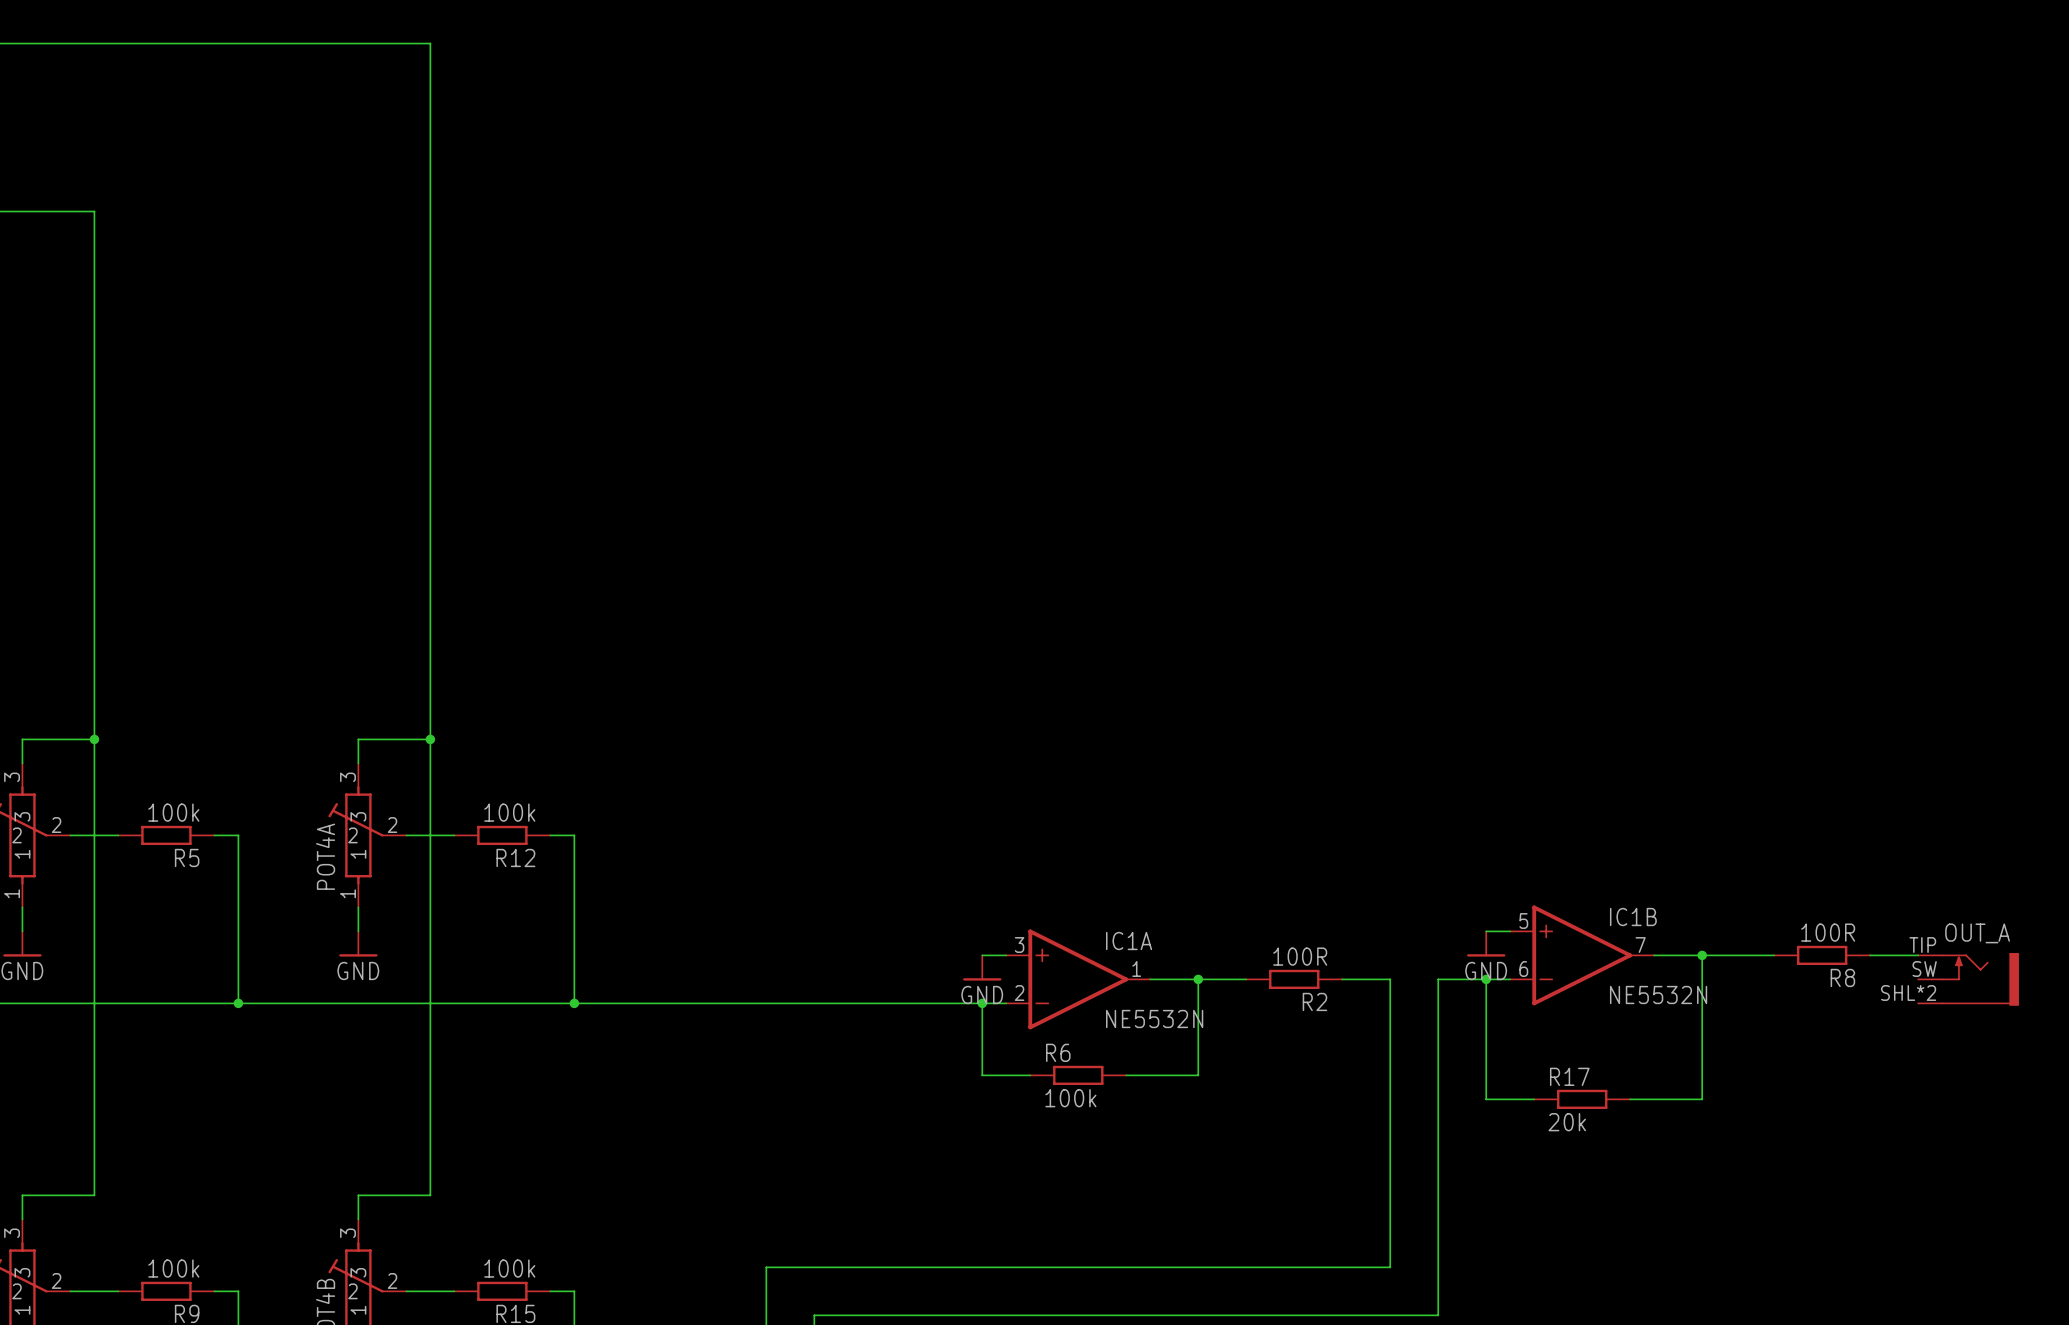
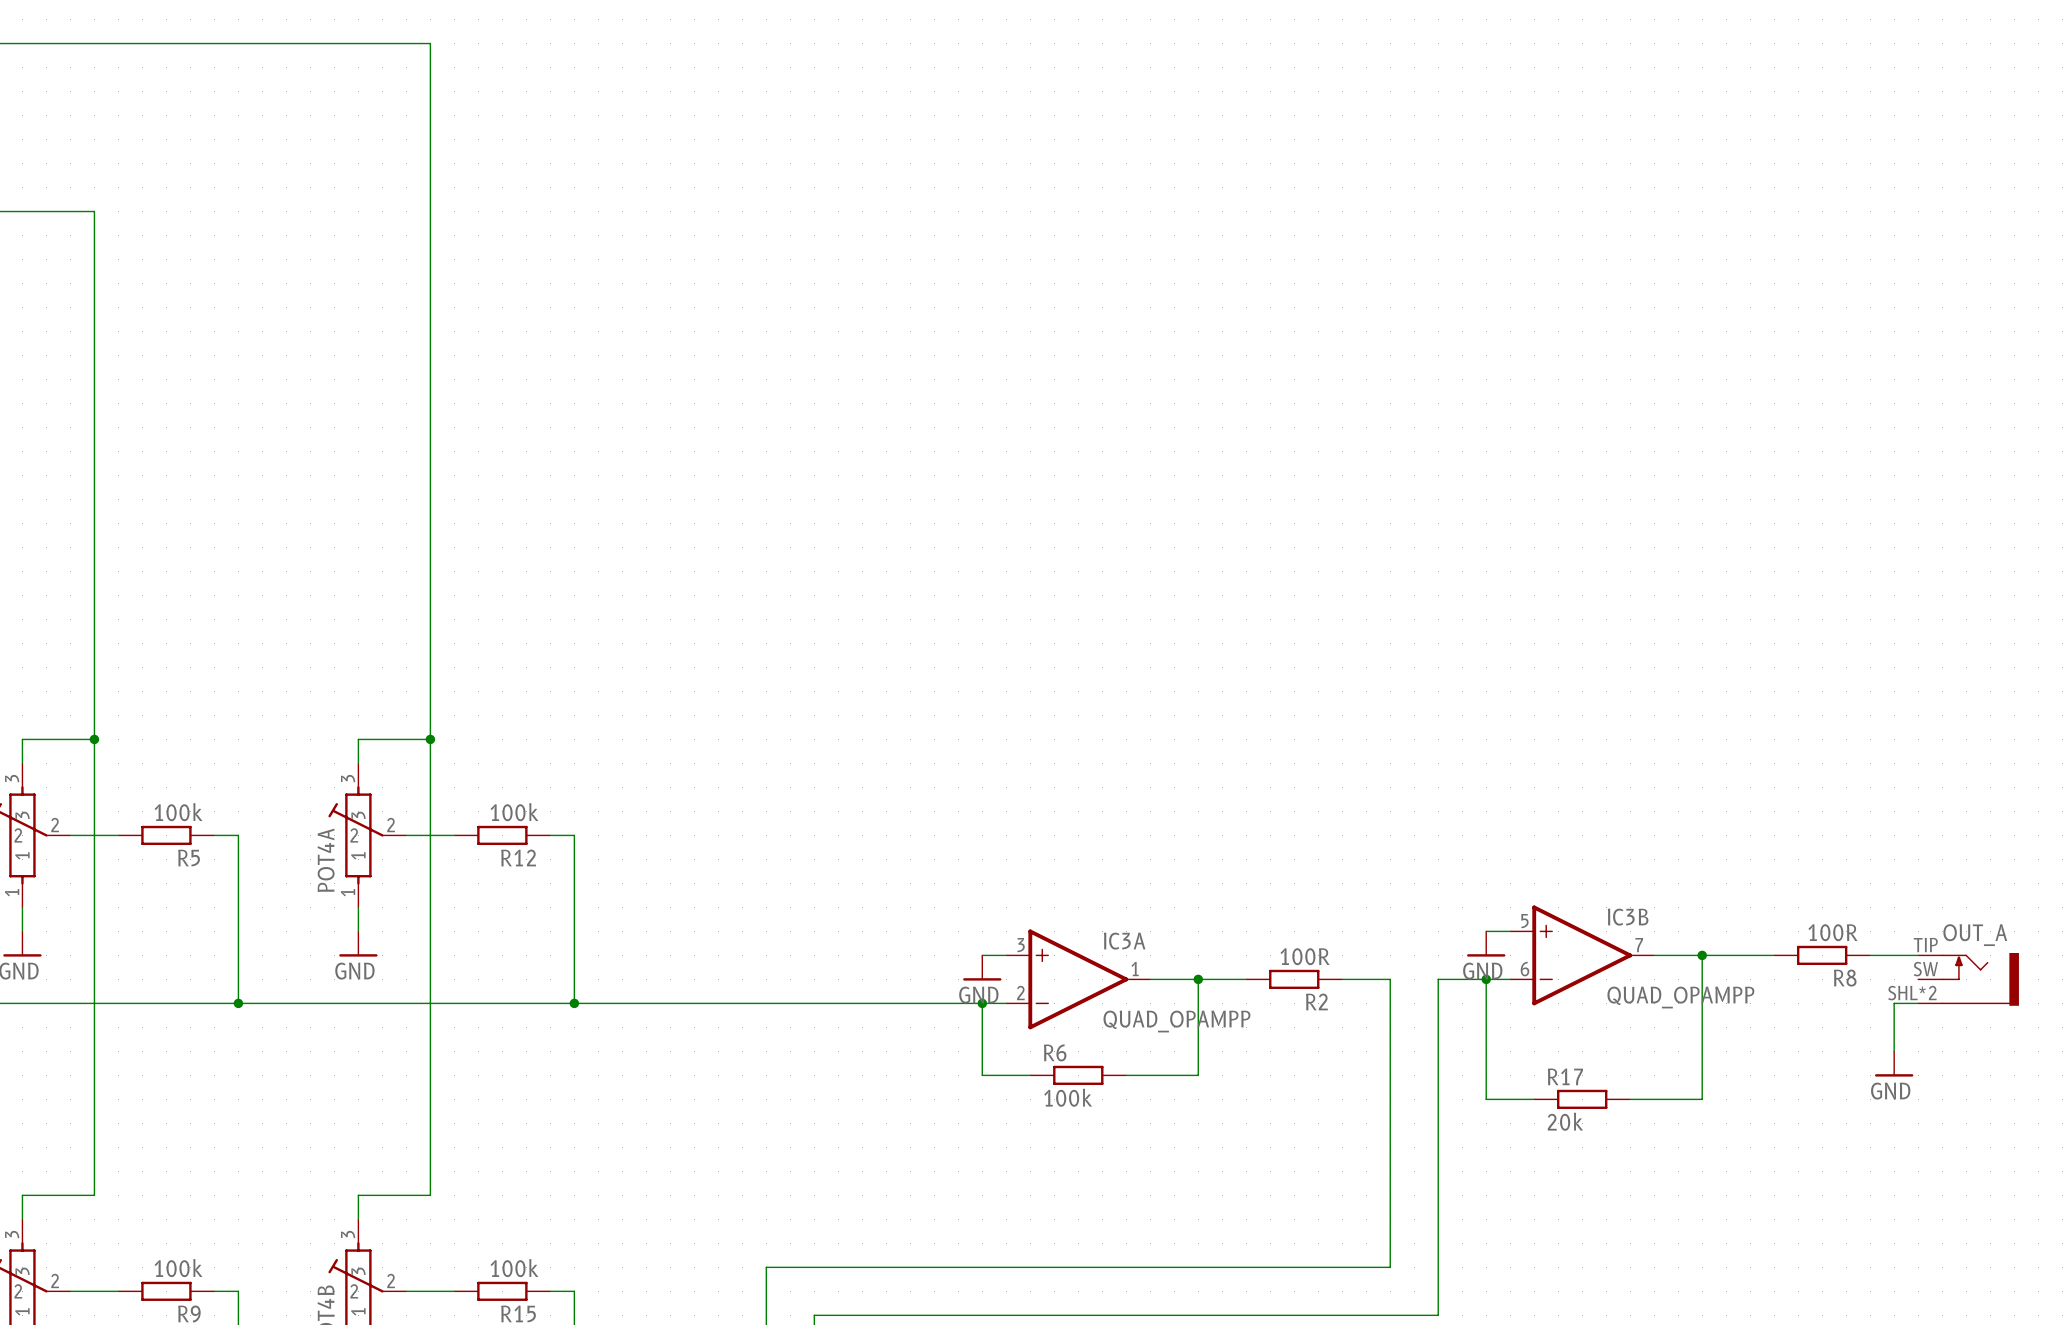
IC1B name: IC1B (1633, 917) -> IC3B (1628, 917)
IC1A name: IC1A (1129, 941) -> IC3A (1124, 941)
IC1B value: NE5532N (1658, 995) -> QUAD_OPAMPP (1680, 997)
wire: none -> (1918, 1003) (1894, 1003) (1894, 1051)
IC1A value: NE5532N (1154, 1018) -> QUAD_OPAMPP (1176, 1021)
power symbol: none -> GND (1894, 1063)

